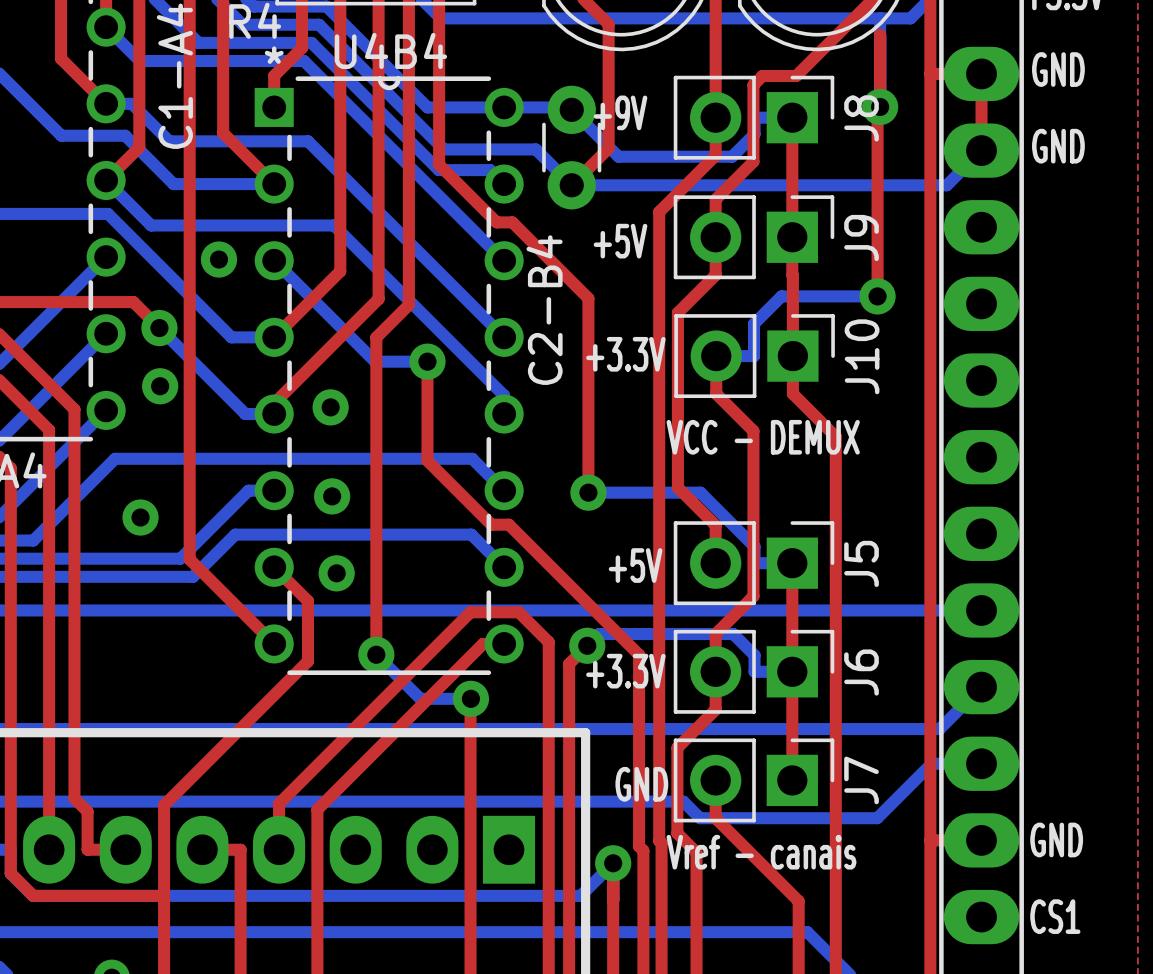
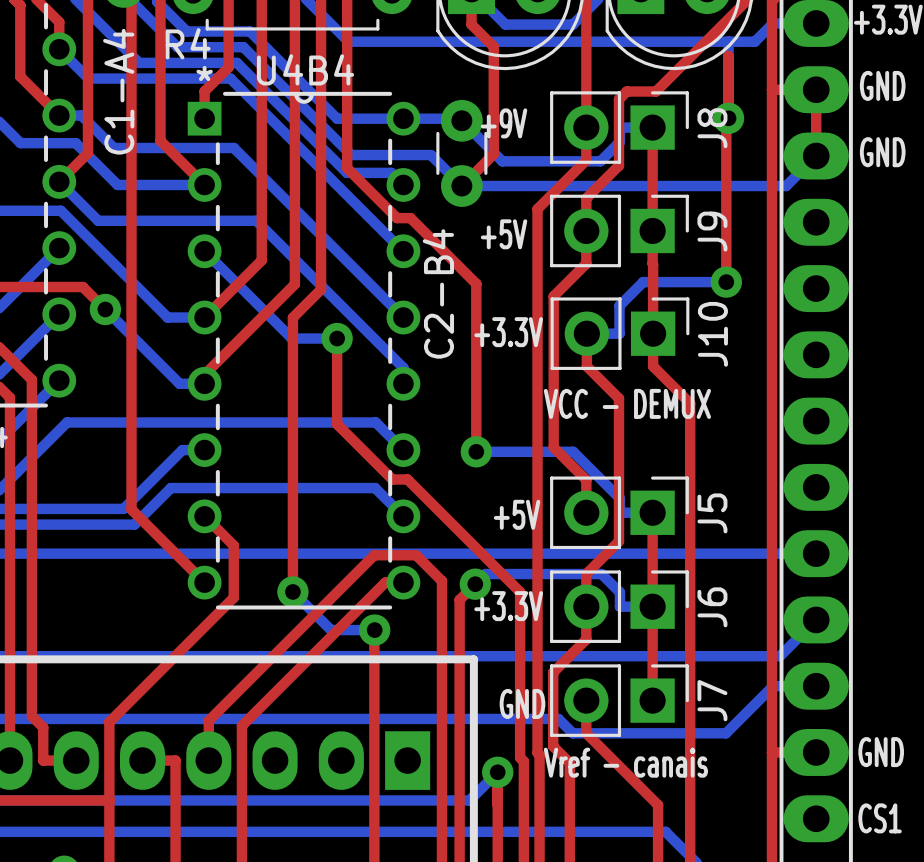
via: (218, 259) -> none
via: (160, 386) -> none
via: (330, 407) -> none
via: (332, 496) -> none
via: (140, 517) -> none
via: (336, 573) -> none

